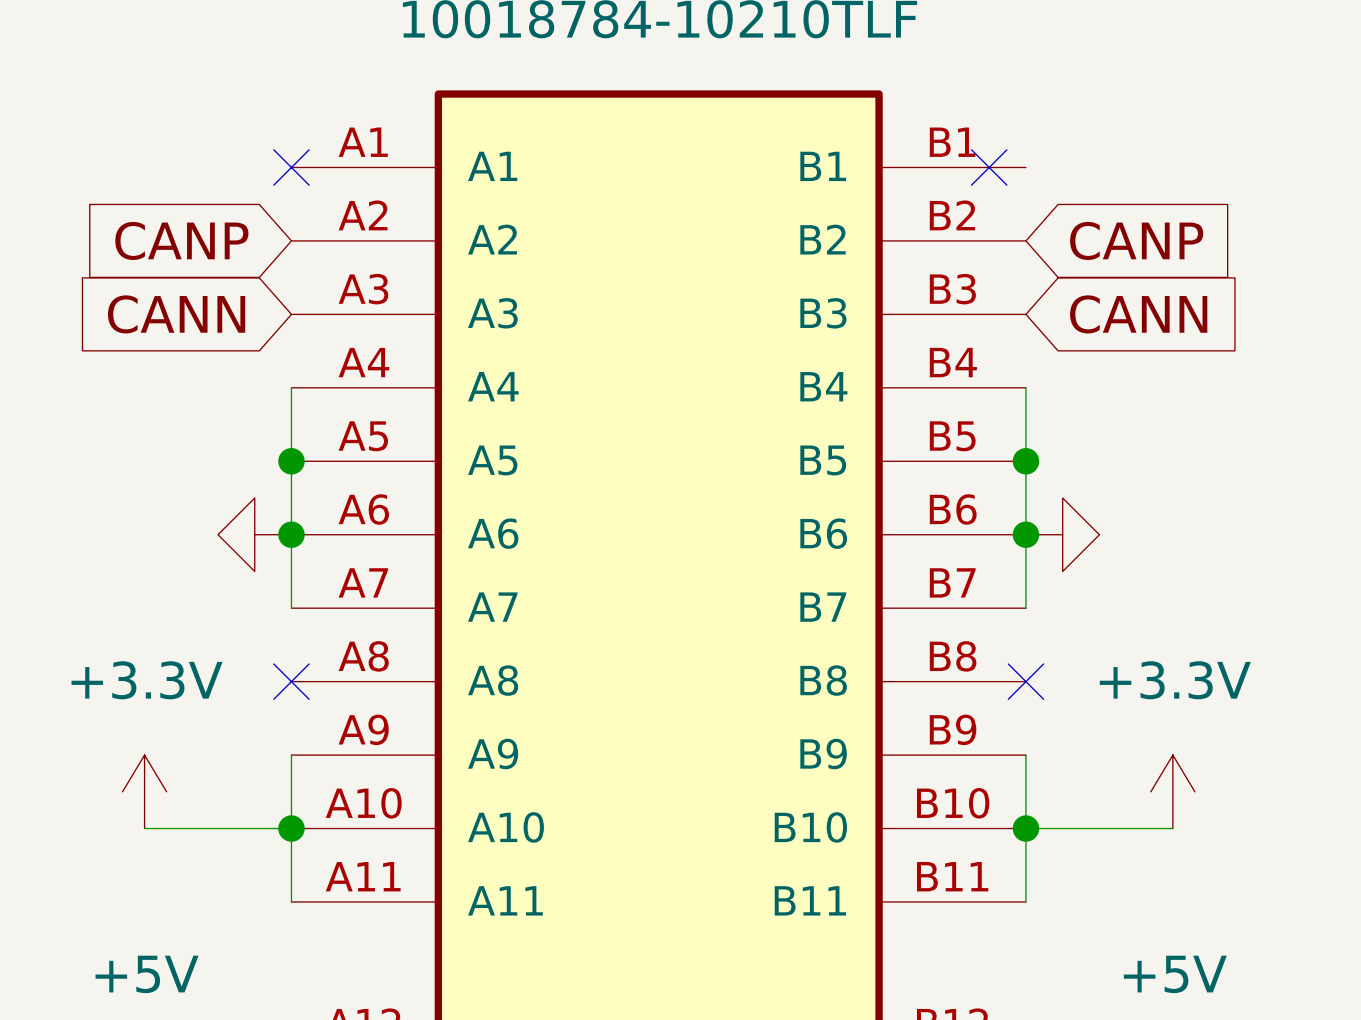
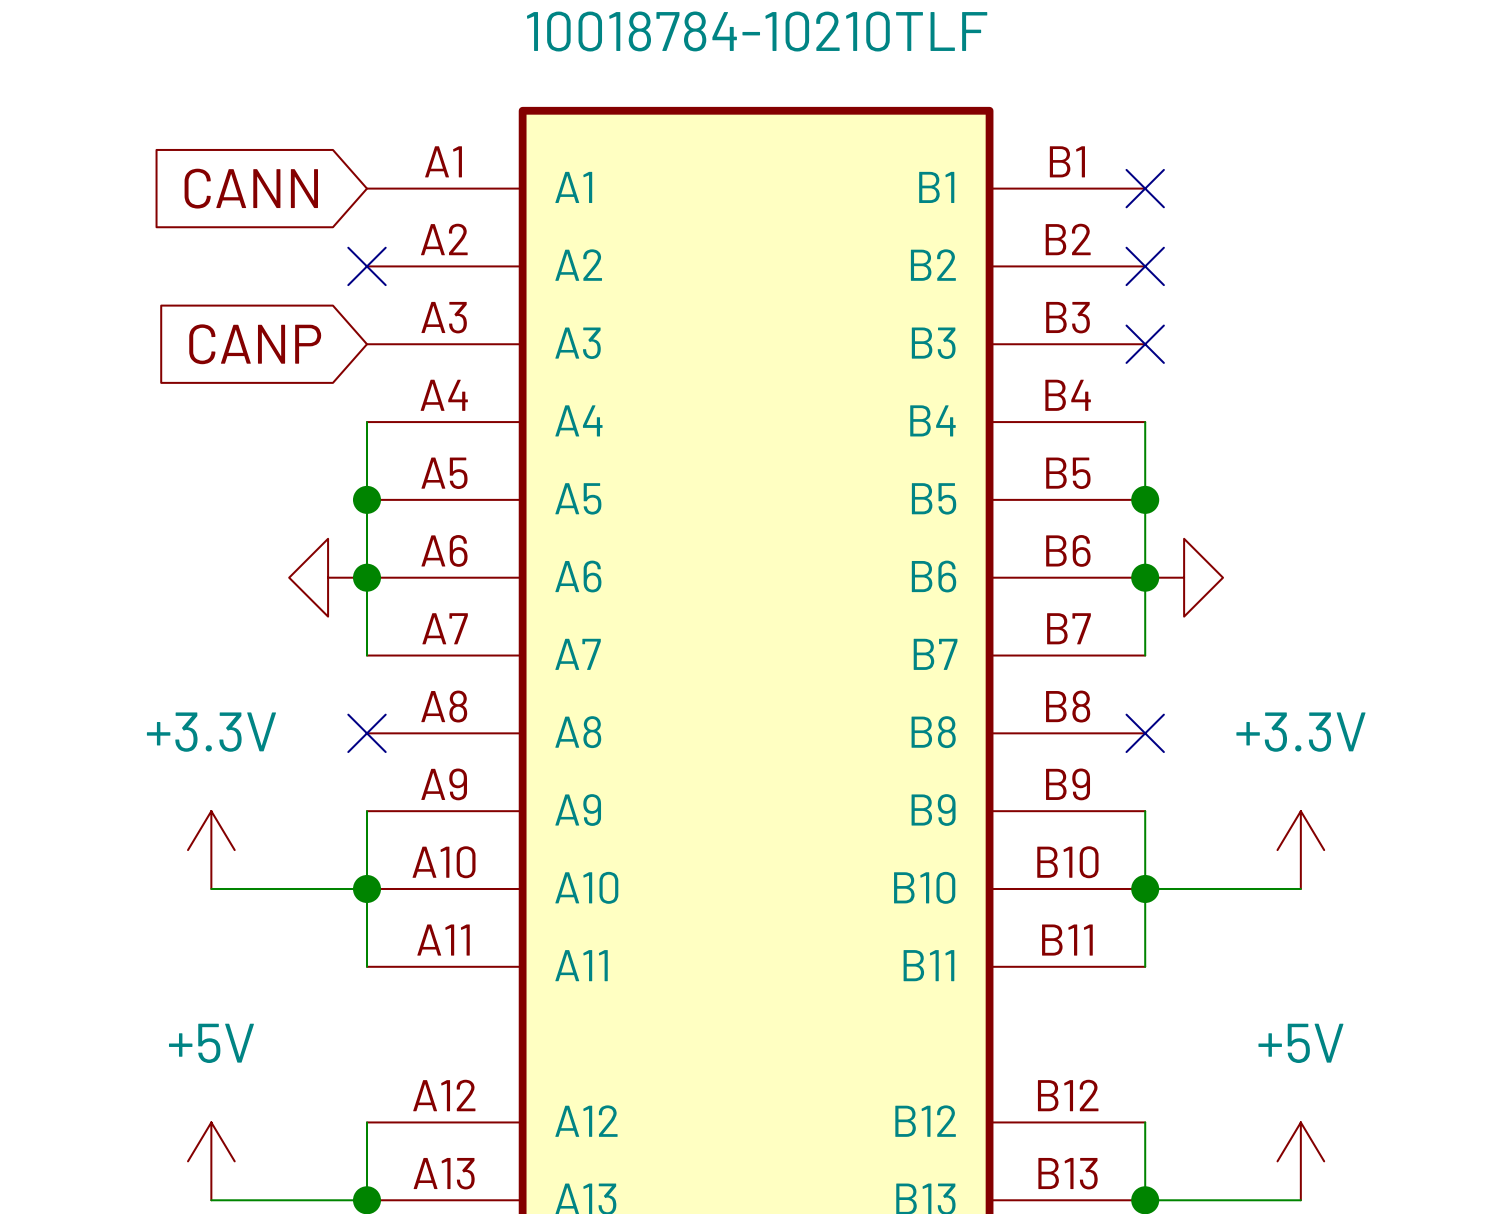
no-connect mark position: (291, 167) -> (366, 266)
no-connect mark position: (989, 167) -> (1145, 188)
global label: CANP (181, 240) -> CANN (251, 188)
no-connect mark: none -> (1145, 266)
global label: CANP (1136, 240) -> none
global label: CANN (176, 314) -> CANP (255, 344)
no-connect mark: none -> (1145, 344)
global label: CANN (1138, 314) -> none

